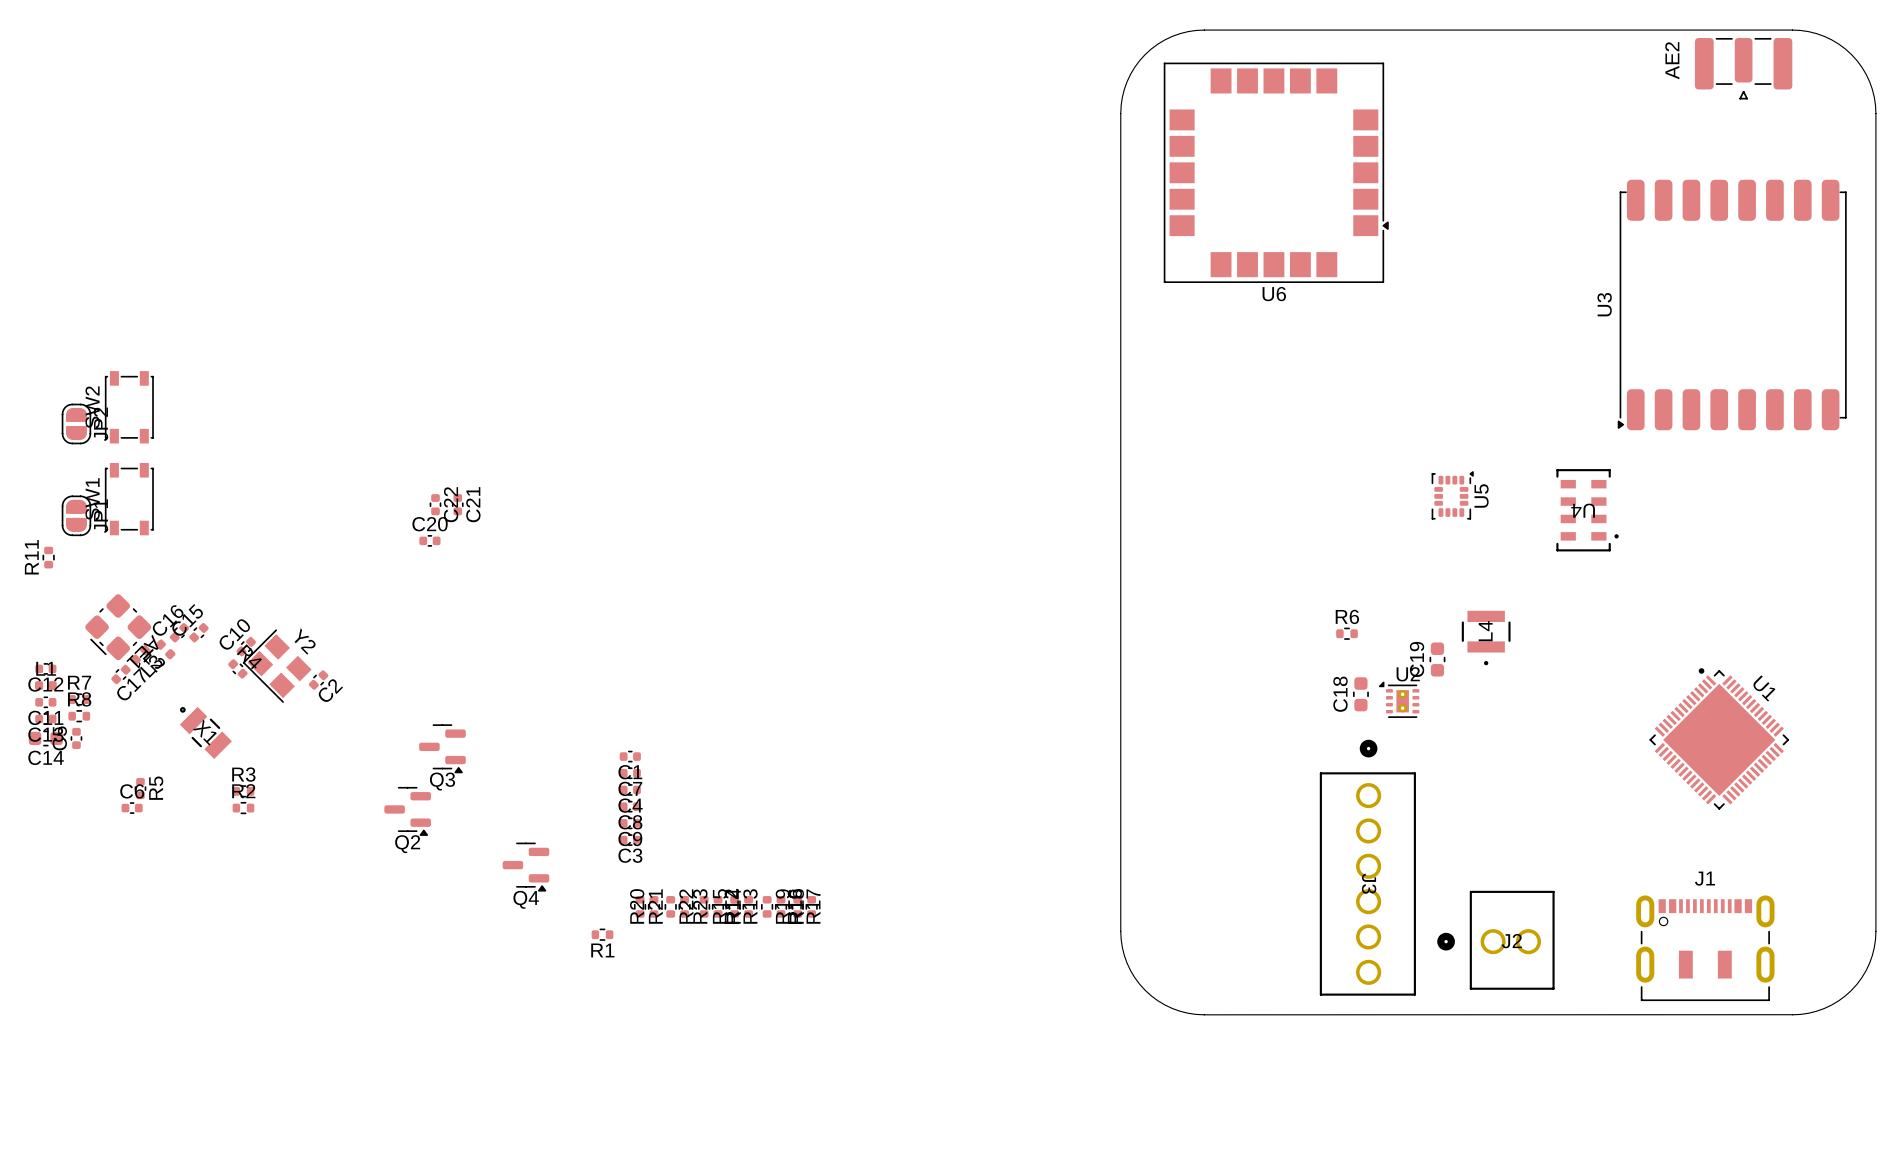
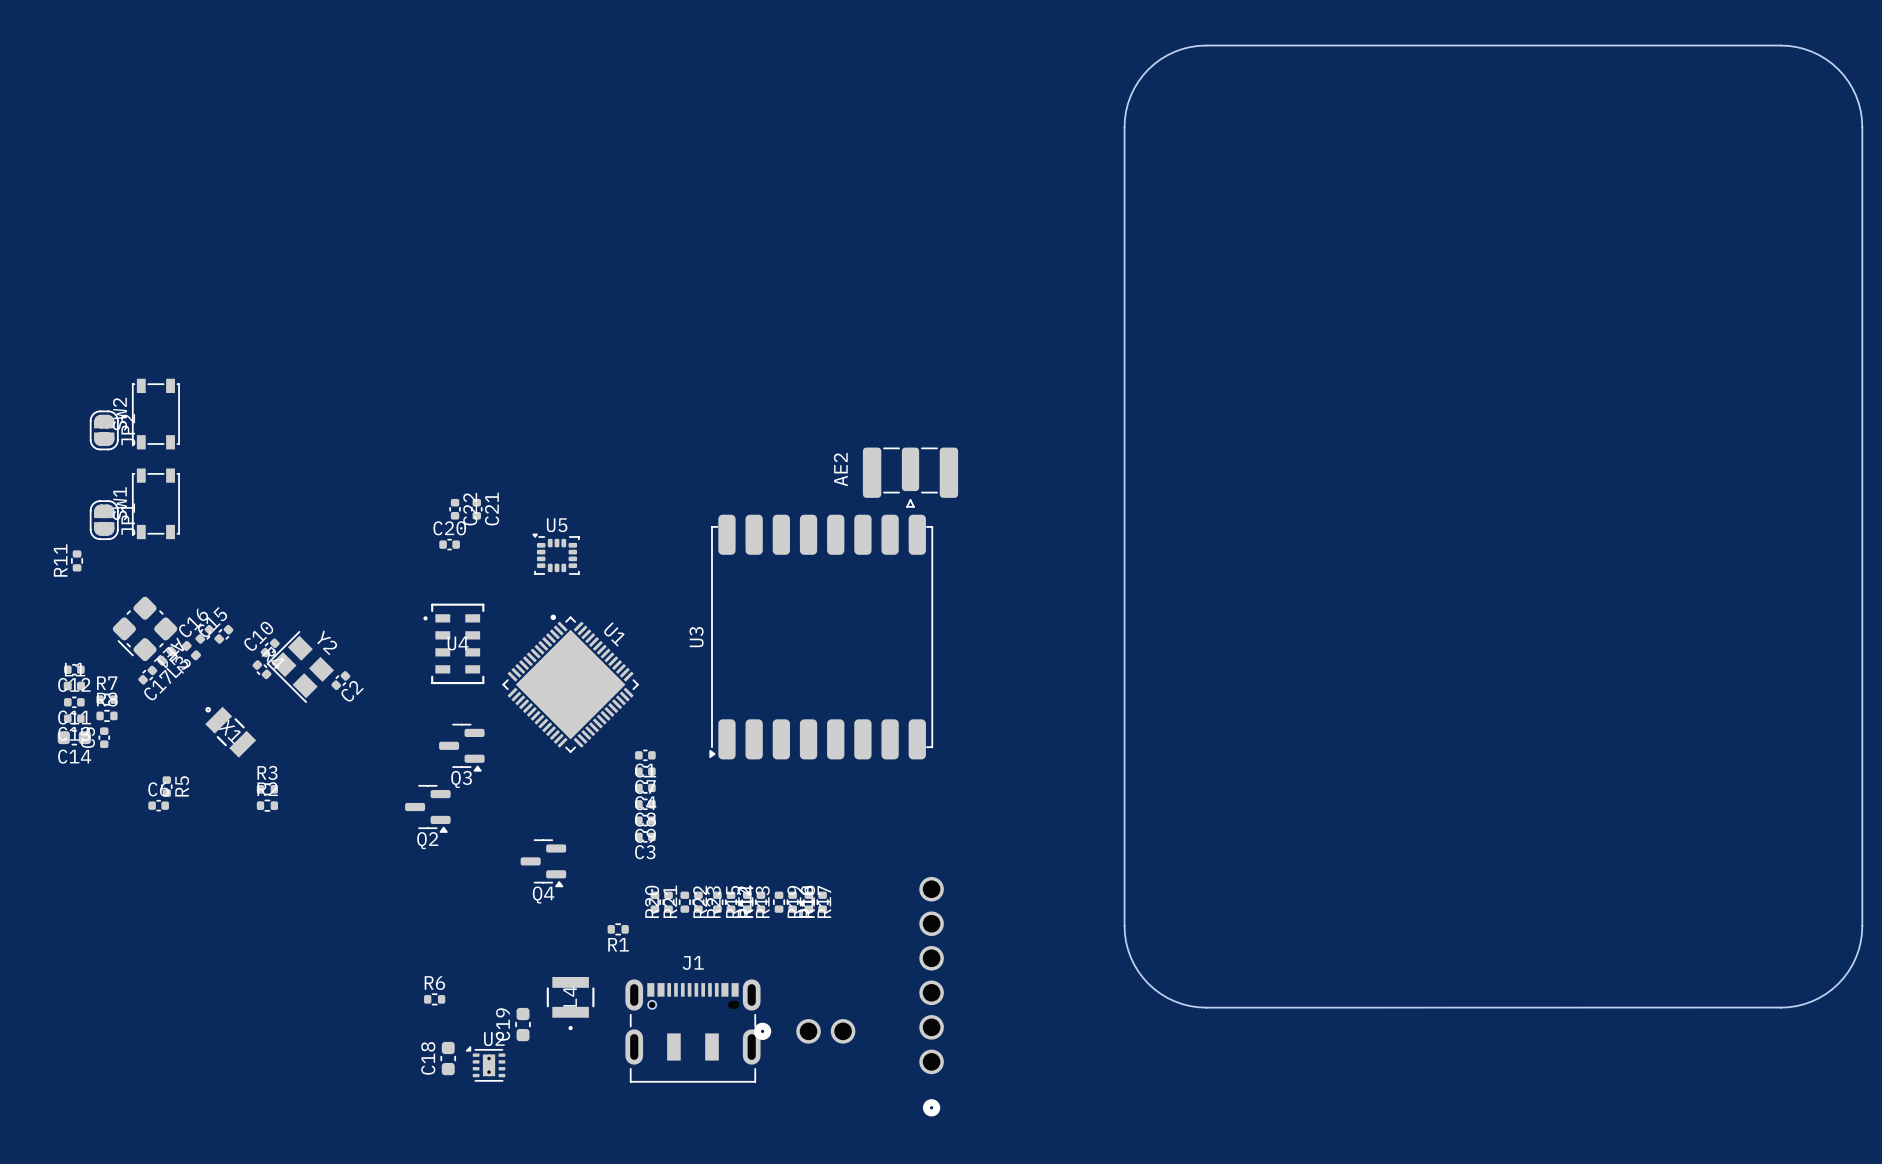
AE2 position: (1743, 68) -> (910, 477)
U6: (1276, 172) -> none
U3 position: (1732, 305) -> (821, 637)
U5 rotation: 0° (1452, 495) -> 90° counterclockwise (556, 554)
U5 position: (1452, 495) -> (556, 554)
U4 rotation: 0° (1587, 510) -> 180° (453, 643)
U4 position: (1587, 510) -> (453, 643)
R6 position: (1347, 633) -> (434, 999)
L4 position: (1486, 638) -> (570, 1003)
C19 position: (1437, 659) -> (523, 1024)
C18 position: (1360, 694) -> (448, 1058)
U2 position: (1399, 699) -> (485, 1063)
U1 position: (1719, 738) -> (570, 683)
J3: (1367, 867) -> none
J2: (1495, 940) -> none
J1 position: (1705, 948) -> (692, 1030)
part: none -> (931, 996)
part: none -> (804, 1031)

